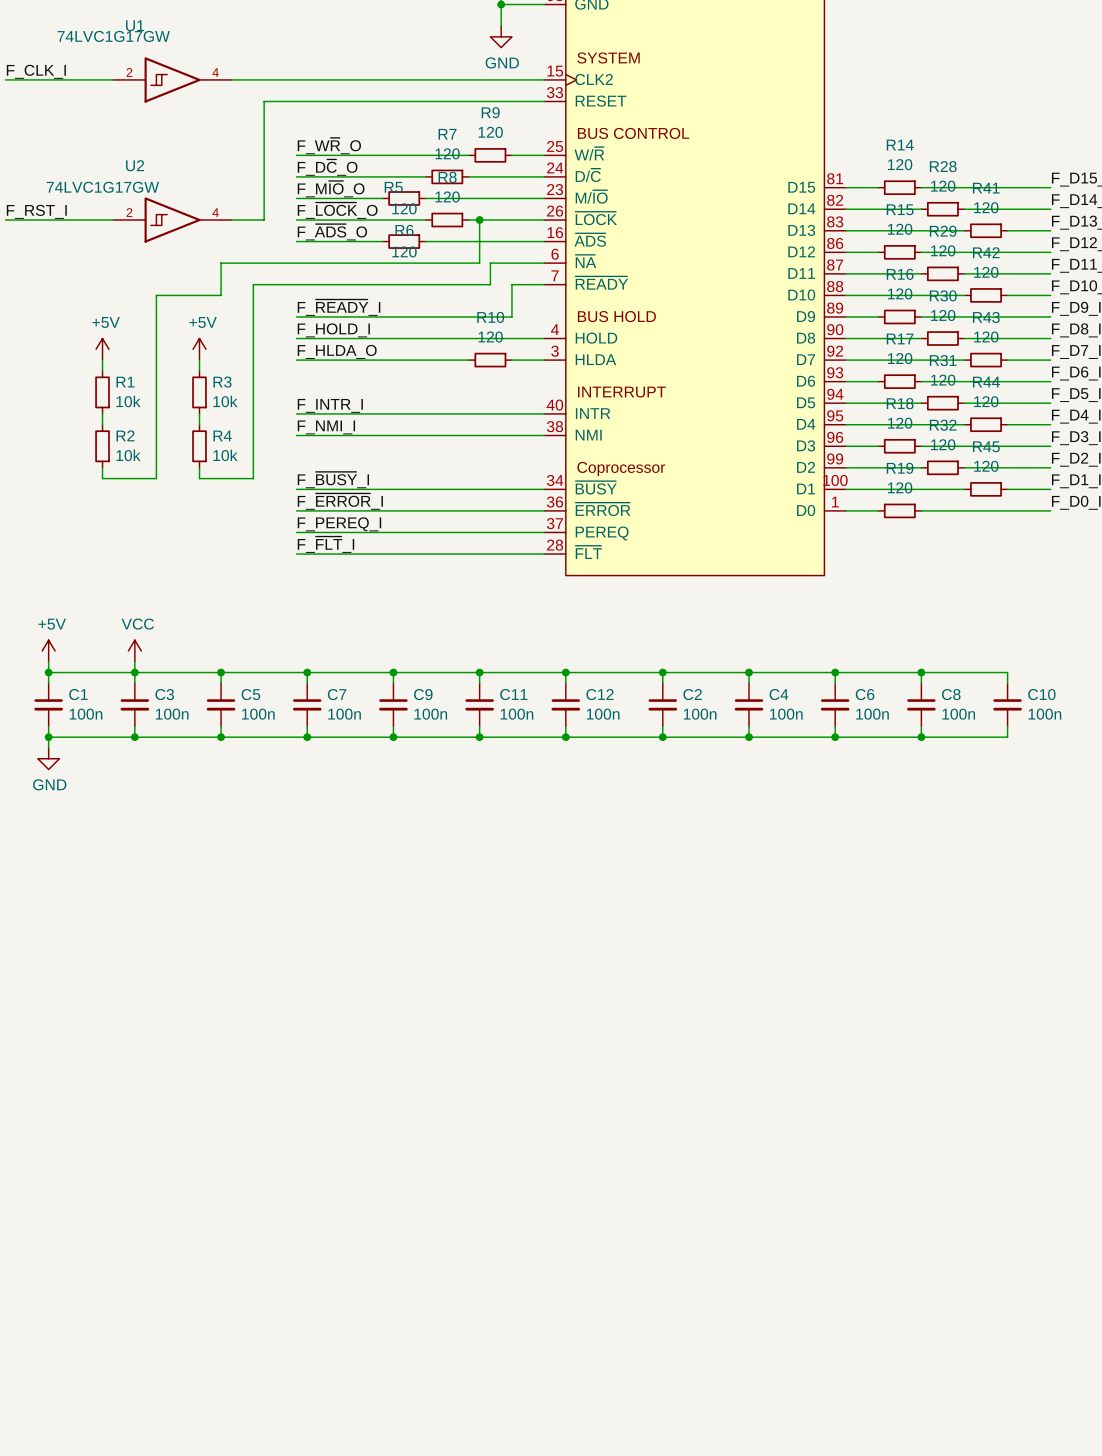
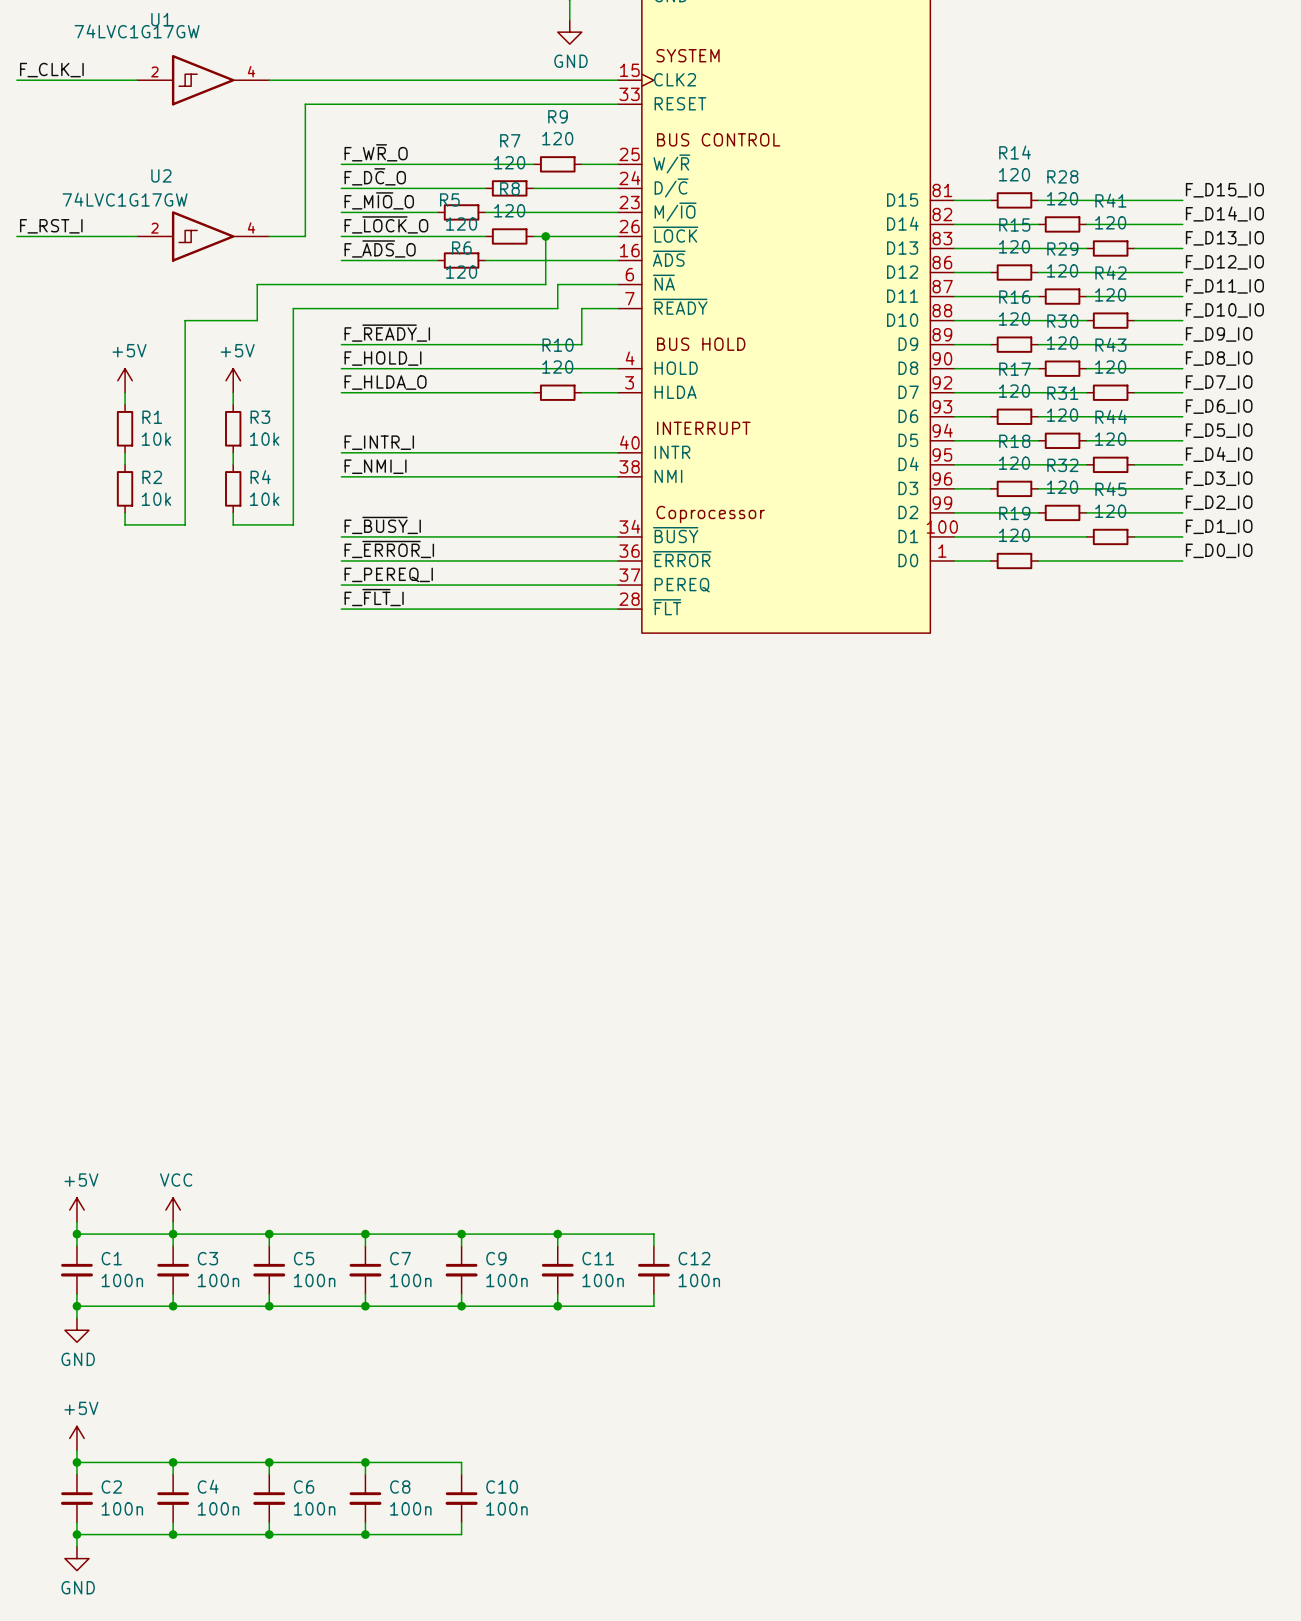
power symbol: +5V (48, 650) -> none
power symbol: VCC (134, 650) -> none
wire: (48, 661) (48, 683) -> none
wire: (134, 661) (134, 683) -> none
wire: (48, 672) (1007, 672) (1007, 683) -> none
junction: (48, 672) -> none
junction: (134, 672) -> none
wire: (221, 672) (221, 683) -> none
junction: (221, 672) -> none
wire: (307, 672) (307, 683) -> none
junction: (307, 672) -> none
wire: (393, 672) (393, 683) -> none
junction: (393, 672) -> none
wire: (479, 672) (479, 683) -> none
junction: (479, 672) -> none
wire: (565, 672) (565, 683) -> none
junction: (565, 672) -> none
wire: (662, 672) (662, 683) -> none
junction: (662, 672) -> none
wire: (748, 672) (748, 683) -> none
junction: (748, 672) -> none
wire: (835, 672) (835, 683) -> none
junction: (835, 672) -> none
wire: (921, 672) (921, 683) -> none
junction: (921, 672) -> none
C1 position: (48, 704) -> (76, 1270)
C3 position: (134, 704) -> (173, 1270)
C5 position: (221, 704) -> (269, 1270)
C7 position: (307, 704) -> (365, 1270)
C9 position: (393, 704) -> (461, 1270)
C11 position: (479, 704) -> (557, 1270)
C12 position: (565, 704) -> (653, 1270)
C2 position: (662, 704) -> (76, 1498)
C4 position: (748, 704) -> (173, 1498)
C6 position: (835, 704) -> (269, 1498)
C8 position: (921, 704) -> (365, 1498)
C10 position: (1007, 704) -> (461, 1498)
wire: (48, 726) (48, 747) -> none
wire: (134, 726) (134, 737) -> none
wire: (221, 726) (221, 737) -> none
wire: (307, 726) (307, 737) -> none
wire: (393, 726) (393, 737) -> none
wire: (479, 726) (479, 737) -> none
wire: (565, 726) (565, 737) -> none
wire: (662, 726) (662, 737) -> none
wire: (748, 726) (748, 737) -> none
wire: (835, 726) (835, 737) -> none
wire: (921, 726) (921, 737) -> none
wire: (1007, 726) (1007, 737) (48, 737) -> none
junction: (48, 737) -> none
junction: (134, 737) -> none
junction: (221, 737) -> none
junction: (307, 737) -> none
junction: (393, 737) -> none
junction: (479, 737) -> none
junction: (565, 737) -> none
junction: (662, 737) -> none
junction: (748, 737) -> none
junction: (835, 737) -> none
junction: (921, 737) -> none
power symbol: GND (48, 758) -> none
power symbol: none -> +5V (76, 1210)
power symbol: none -> VCC (173, 1210)
wire: none -> (76, 1222) (76, 1246)
wire: none -> (173, 1222) (173, 1246)
wire: none -> (76, 1234) (653, 1234) (653, 1246)
junction: none -> (76, 1234)
junction: none -> (173, 1234)
wire: none -> (269, 1234) (269, 1246)
junction: none -> (269, 1234)
wire: none -> (365, 1234) (365, 1246)
junction: none -> (365, 1234)
wire: none -> (461, 1234) (461, 1246)
junction: none -> (461, 1234)
wire: none -> (557, 1234) (557, 1246)
junction: none -> (557, 1234)
wire: none -> (76, 1294) (76, 1318)
wire: none -> (173, 1294) (173, 1306)
wire: none -> (269, 1294) (269, 1306)
wire: none -> (365, 1294) (365, 1306)
wire: none -> (461, 1294) (461, 1306)
wire: none -> (557, 1294) (557, 1306)
wire: none -> (653, 1294) (653, 1306) (76, 1306)
junction: none -> (76, 1306)
junction: none -> (173, 1306)
junction: none -> (269, 1306)
junction: none -> (365, 1306)
junction: none -> (461, 1306)
junction: none -> (557, 1306)
power symbol: none -> GND (76, 1330)
power symbol: none -> +5V (76, 1438)
wire: none -> (76, 1450) (76, 1474)
wire: none -> (76, 1462) (461, 1462) (461, 1474)
junction: none -> (76, 1462)
wire: none -> (173, 1462) (173, 1474)
junction: none -> (173, 1462)
wire: none -> (269, 1462) (269, 1474)
junction: none -> (269, 1462)
wire: none -> (365, 1462) (365, 1474)
junction: none -> (365, 1462)
wire: none -> (76, 1522) (76, 1546)
wire: none -> (173, 1522) (173, 1534)
wire: none -> (269, 1522) (269, 1534)
wire: none -> (365, 1522) (365, 1534)
wire: none -> (461, 1522) (461, 1534) (76, 1534)
junction: none -> (76, 1534)
junction: none -> (173, 1534)
junction: none -> (269, 1534)
junction: none -> (365, 1534)
power symbol: none -> GND (76, 1558)

